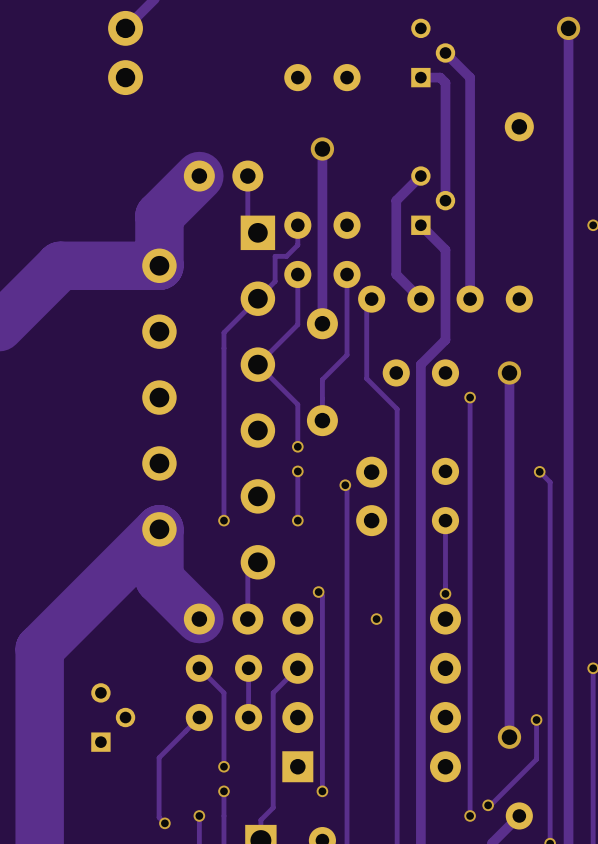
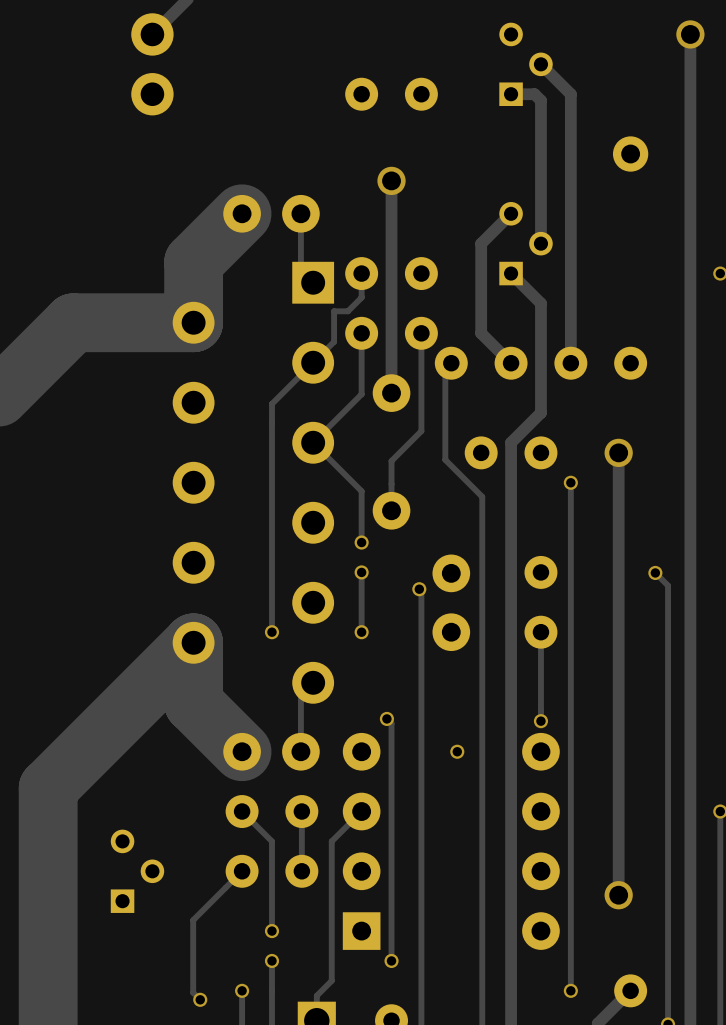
track: (536, 719) (536, 759) (490, 805) (488, 805) -> none
via: (536, 719) -> none
via: (488, 805) -> none

